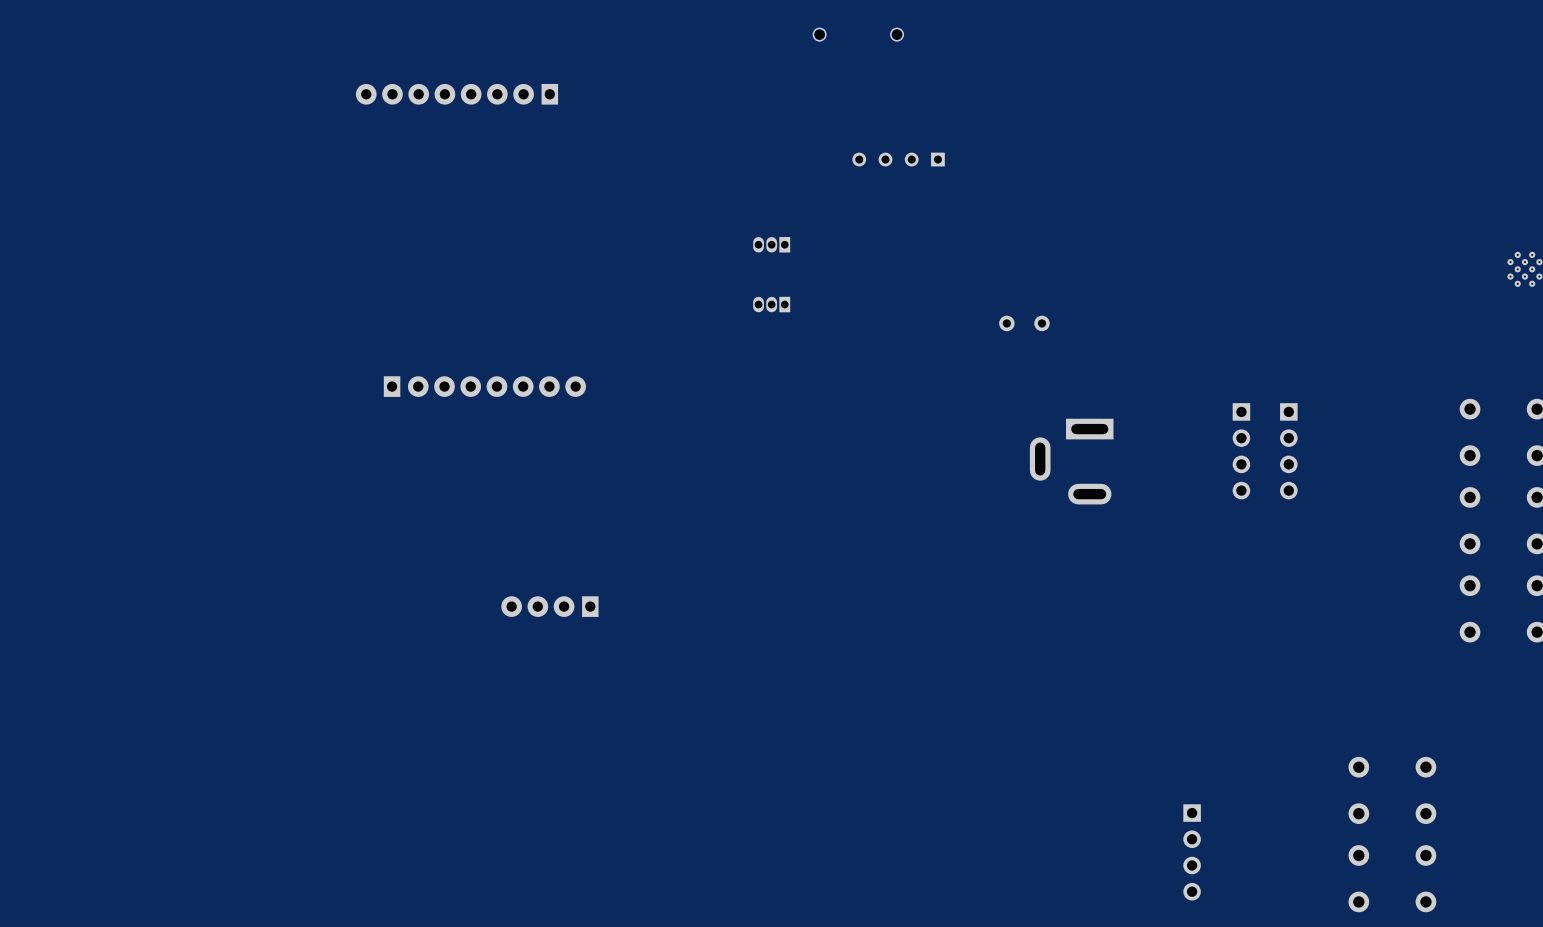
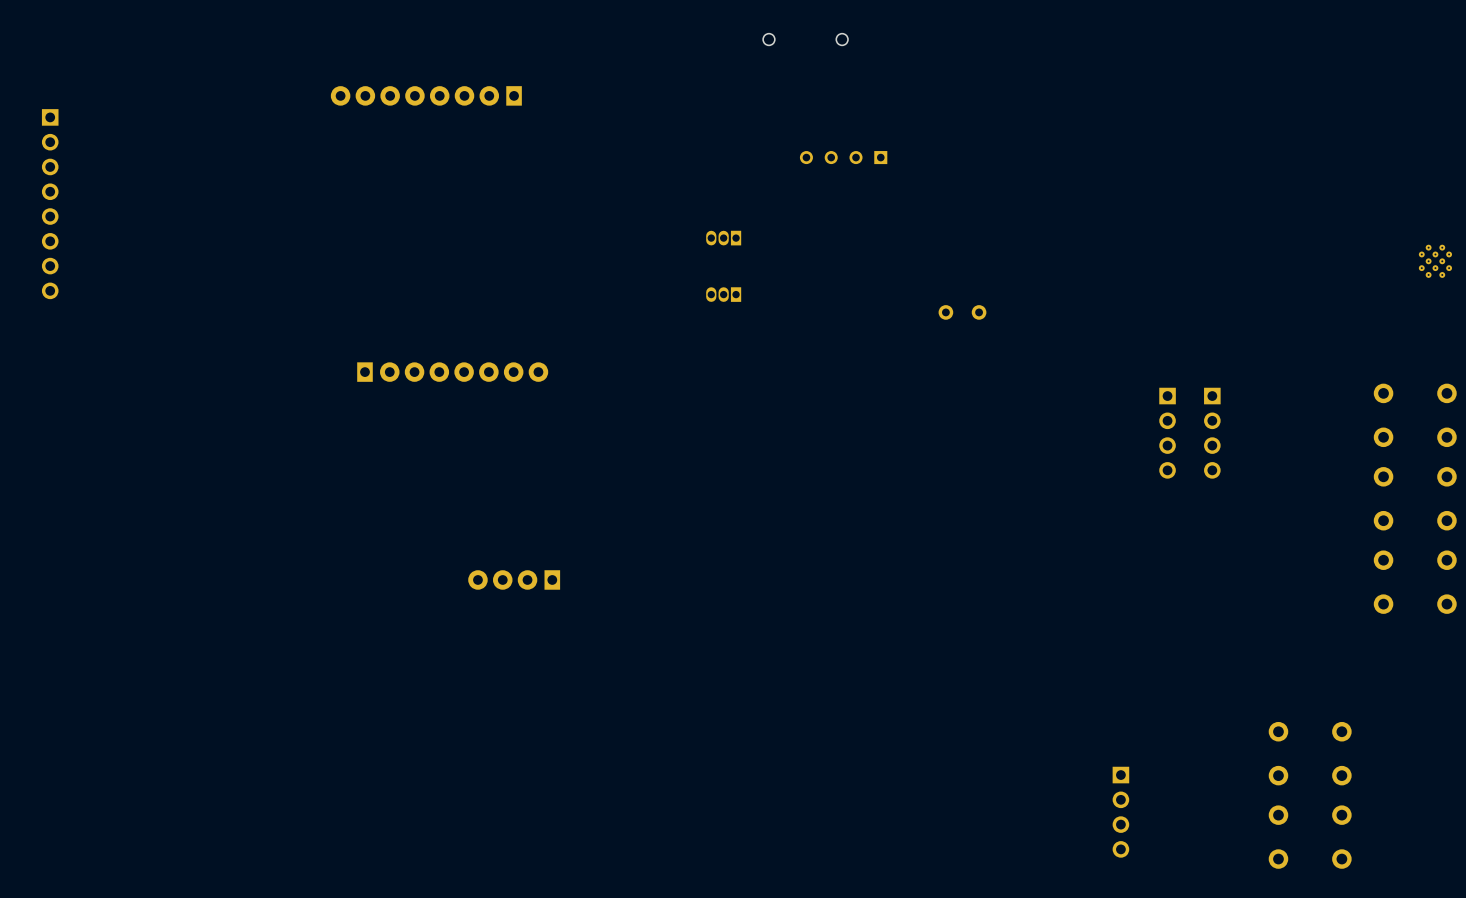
part: none -> (50, 204)
part: (1071, 461) -> none

